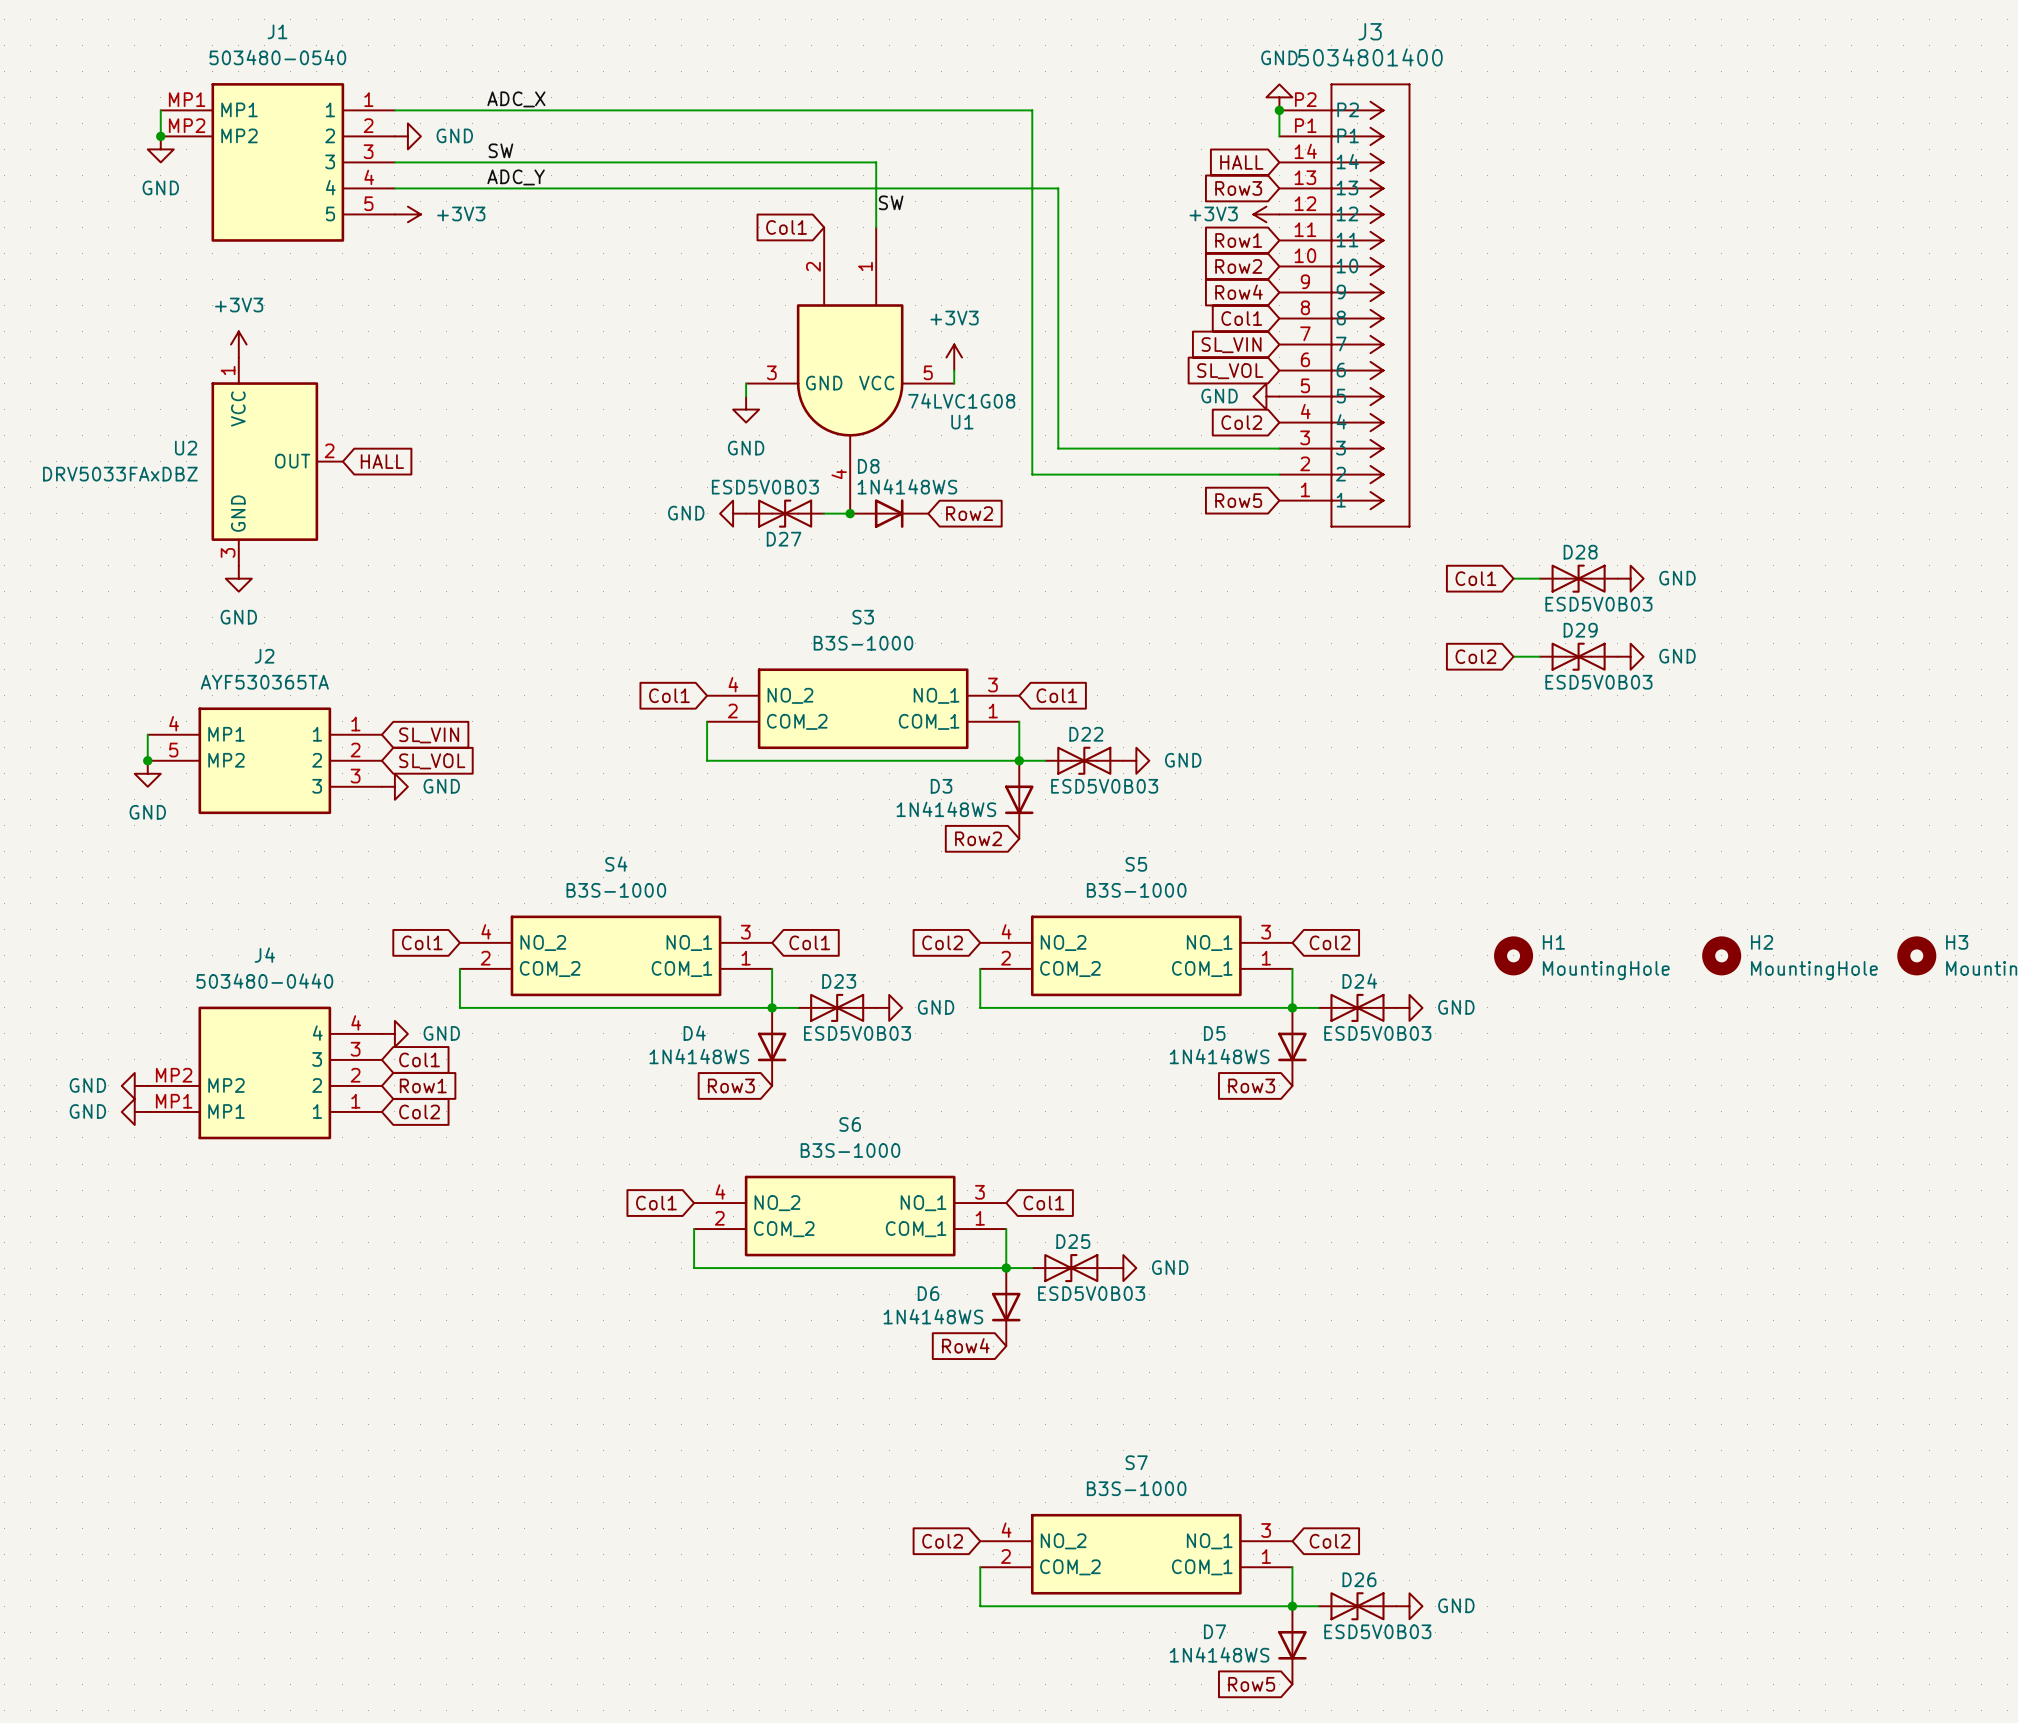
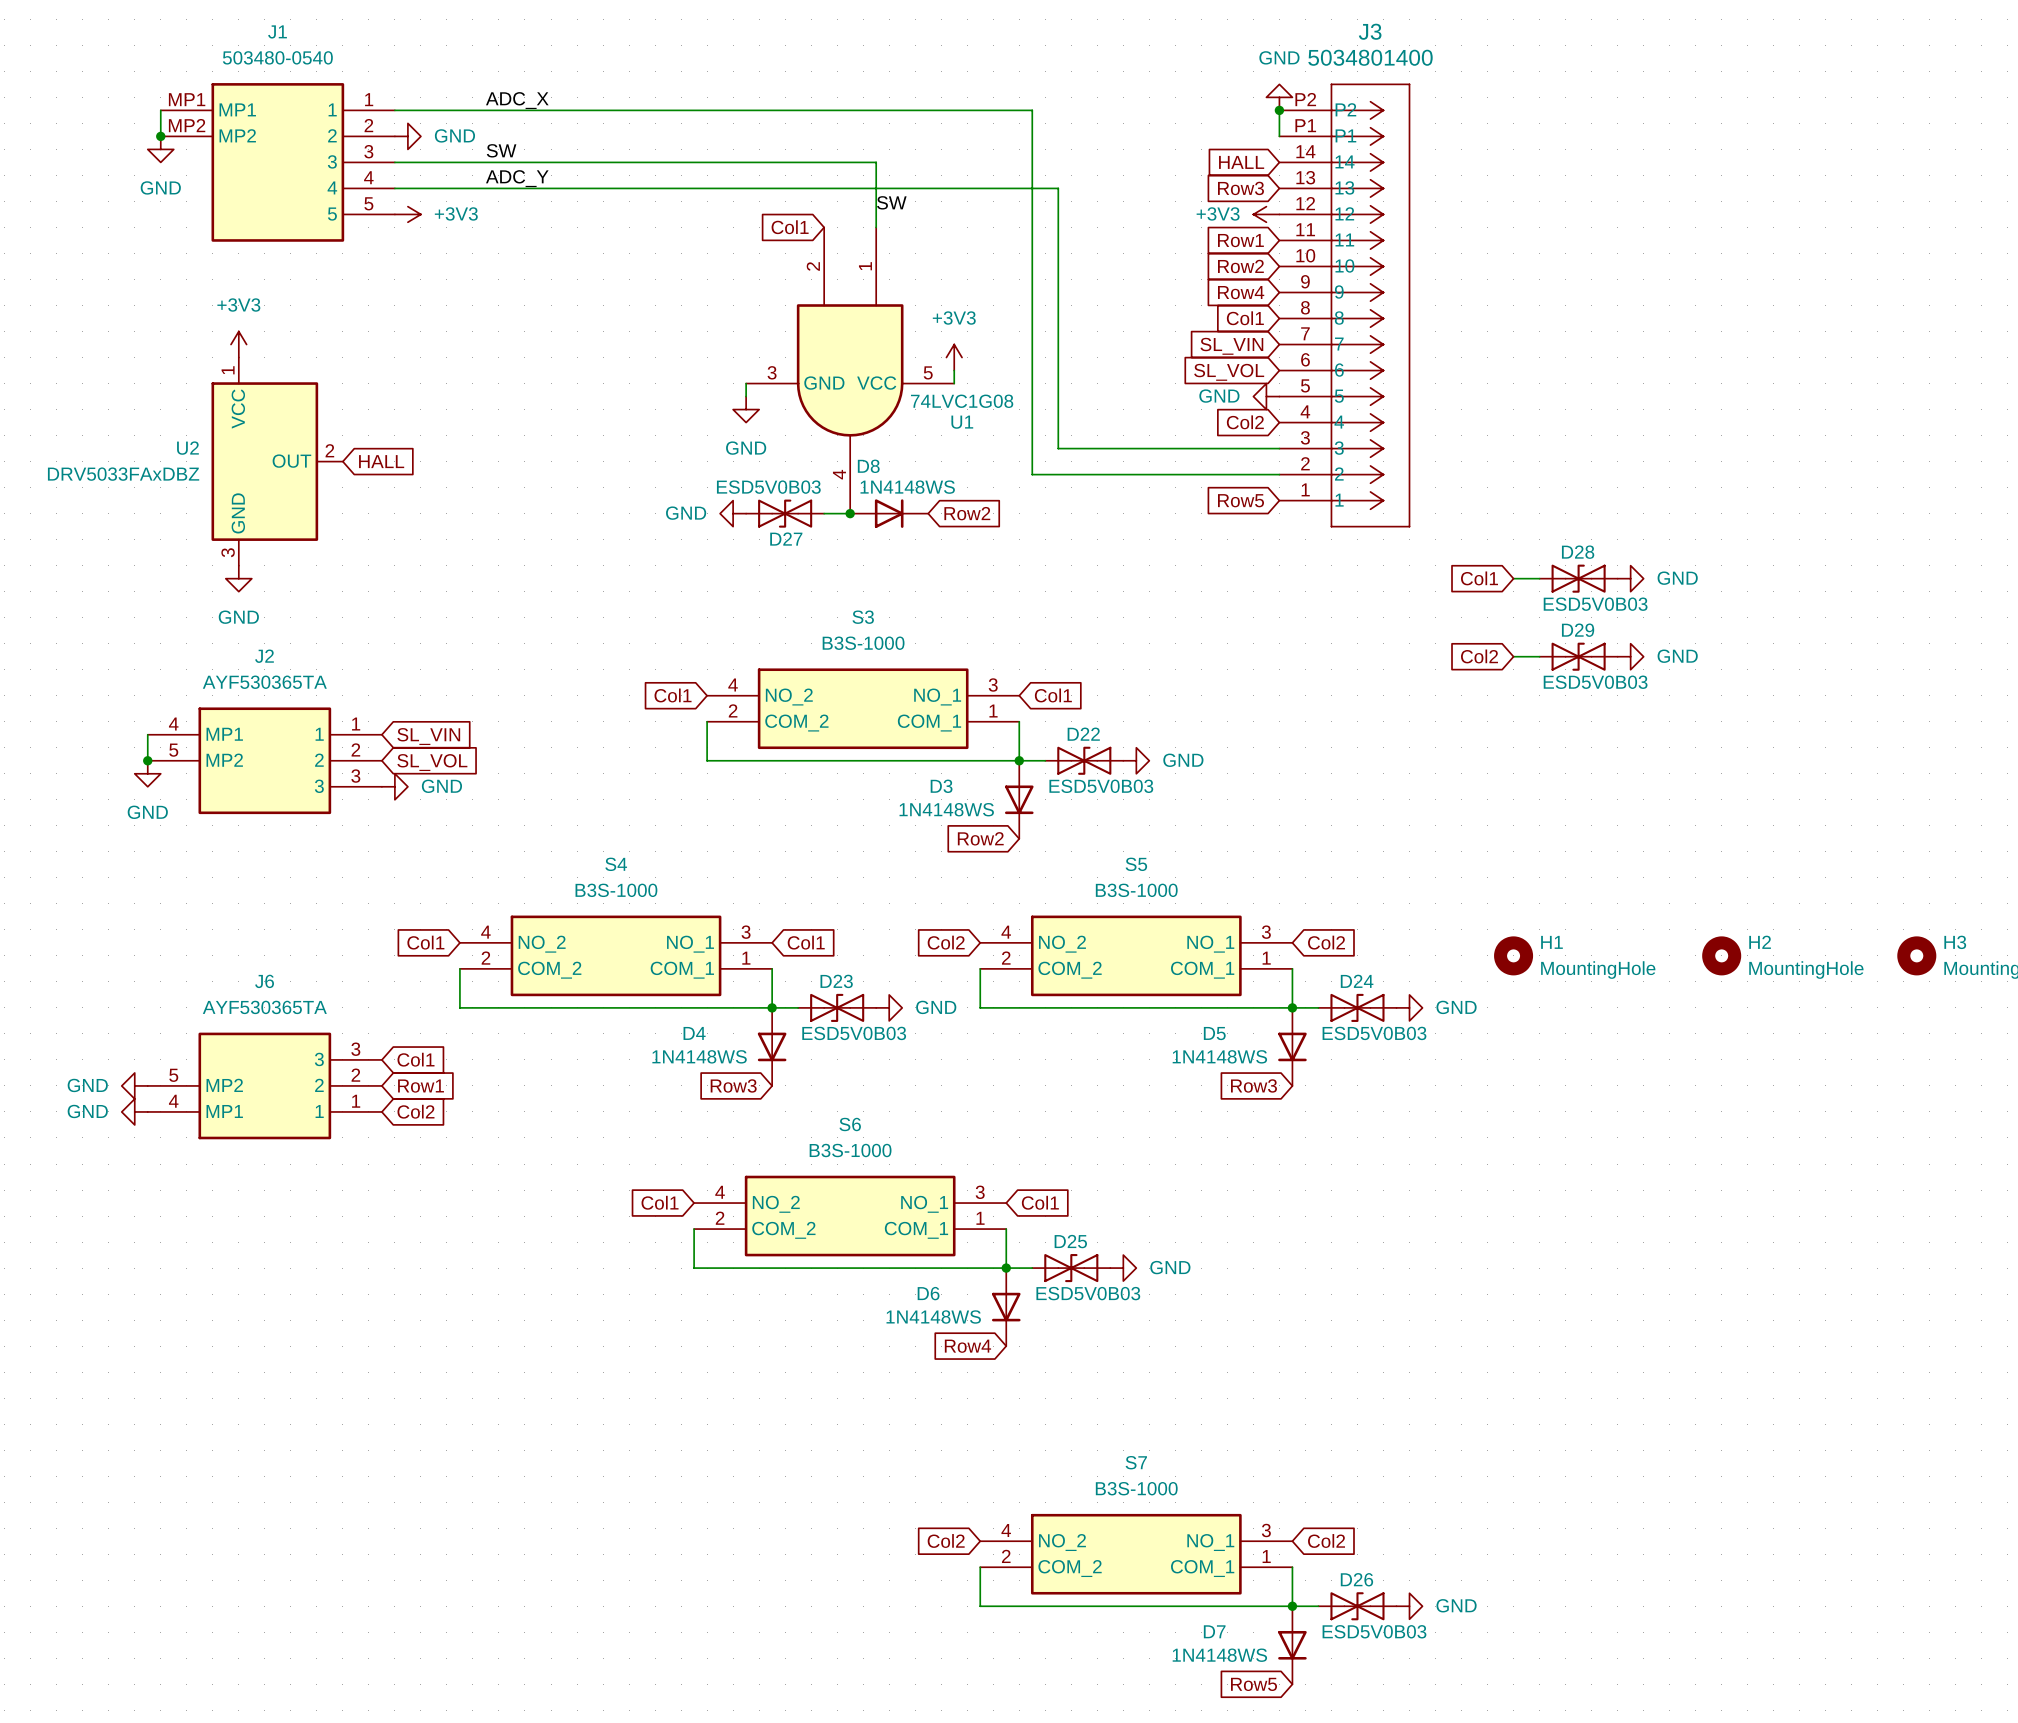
power symbol: GND (394, 1033) -> none
J4: 503480-0440 (264, 1072) -> none
J6: none -> AYF530365TA (264, 1085)

